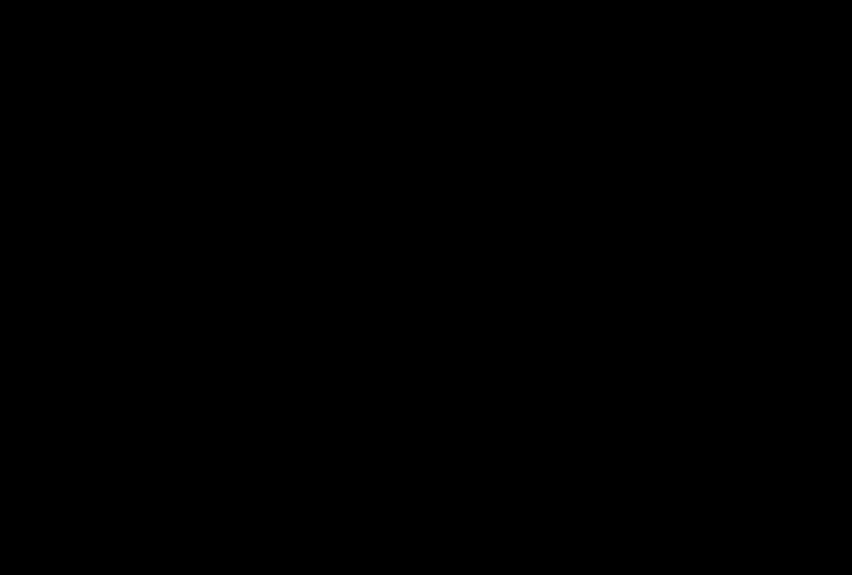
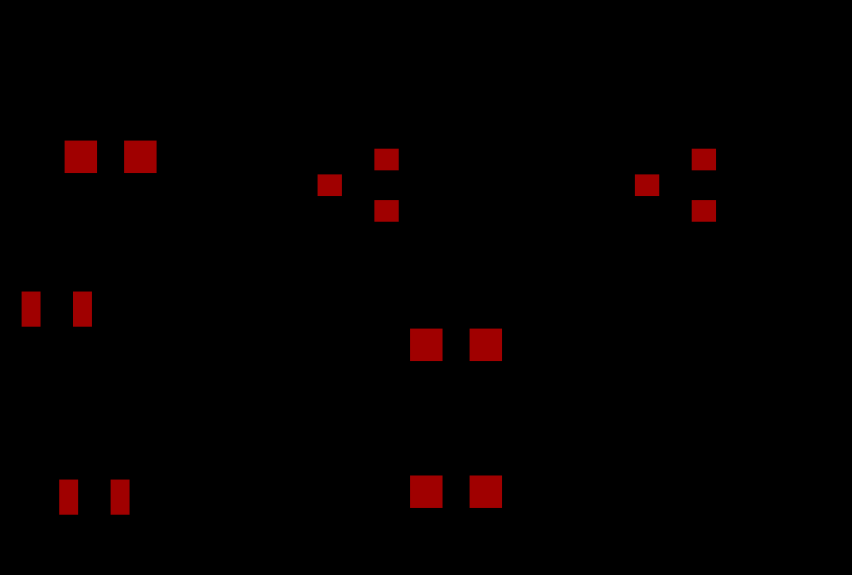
part: none -> (110, 156)
part: none -> (358, 185)
part: none -> (675, 185)
part: none -> (56, 309)
part: none -> (456, 344)
part: none -> (456, 491)
part: none -> (94, 497)

